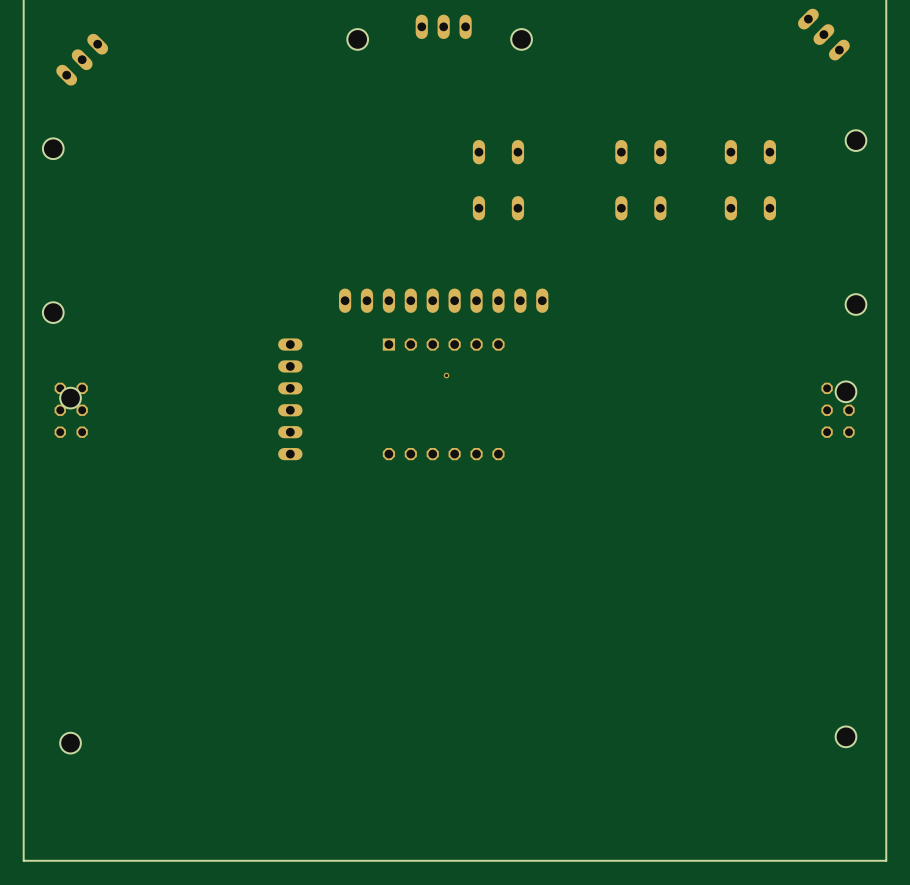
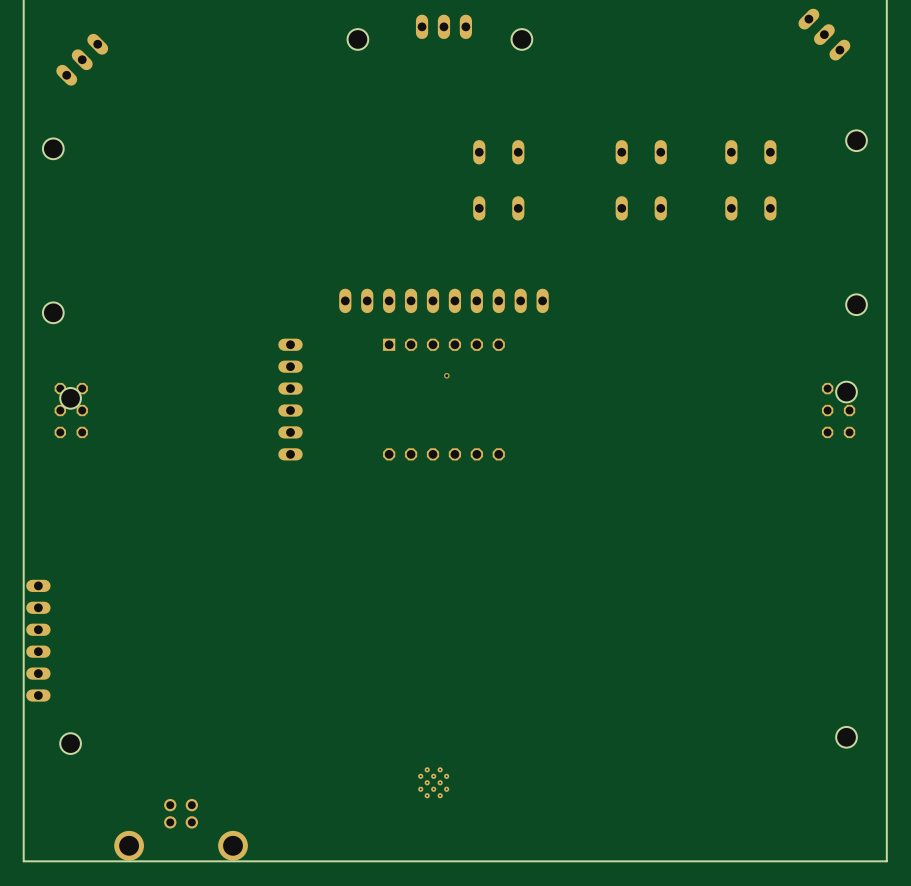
part: none -> (38, 640)
part: none -> (433, 782)
part: none -> (181, 829)

